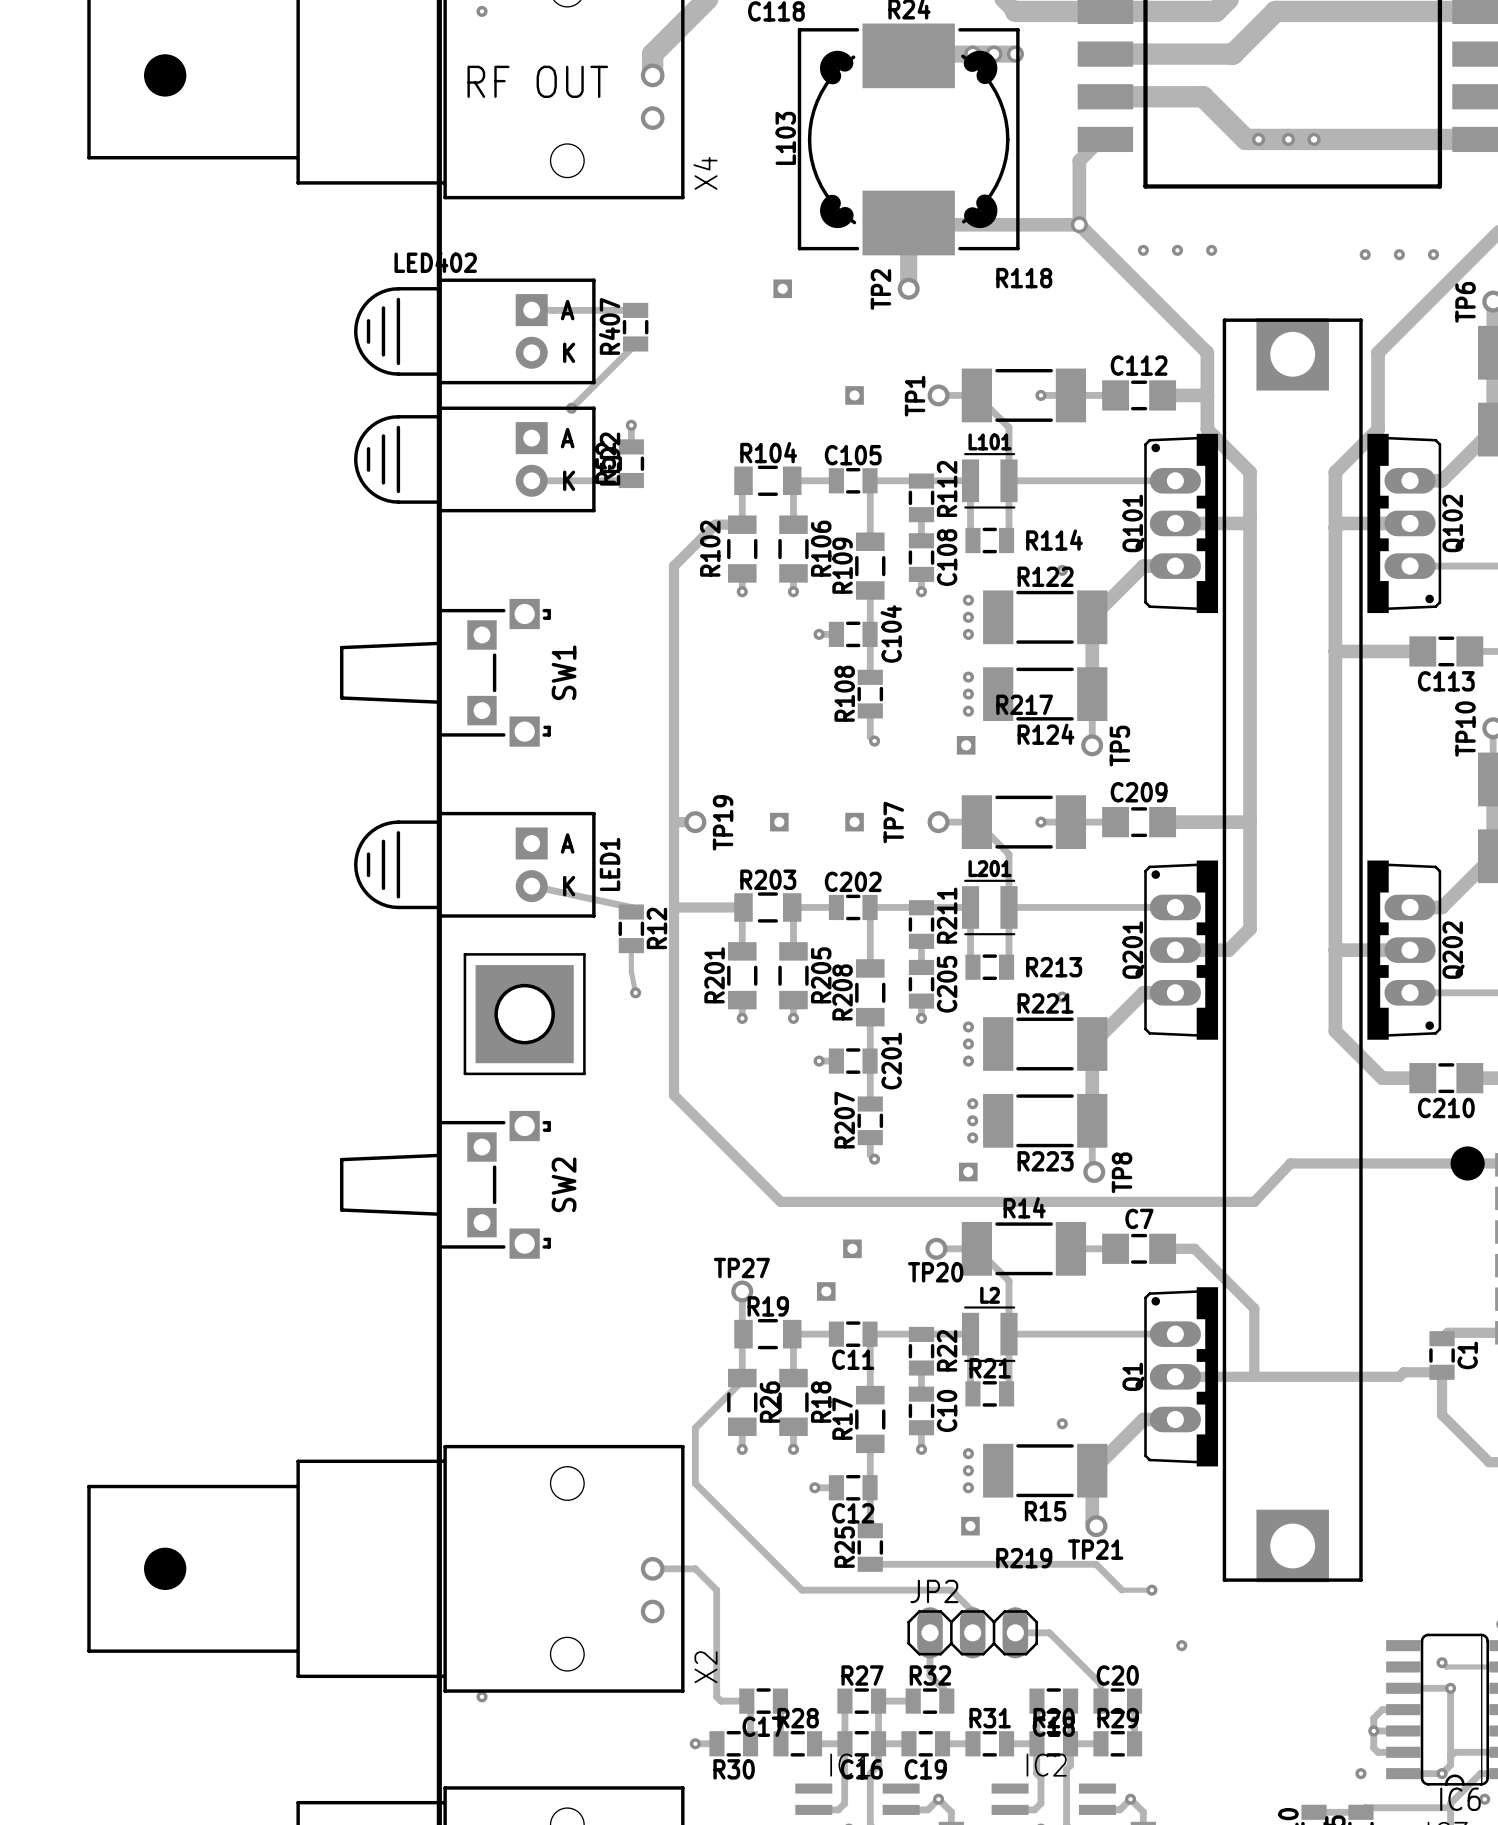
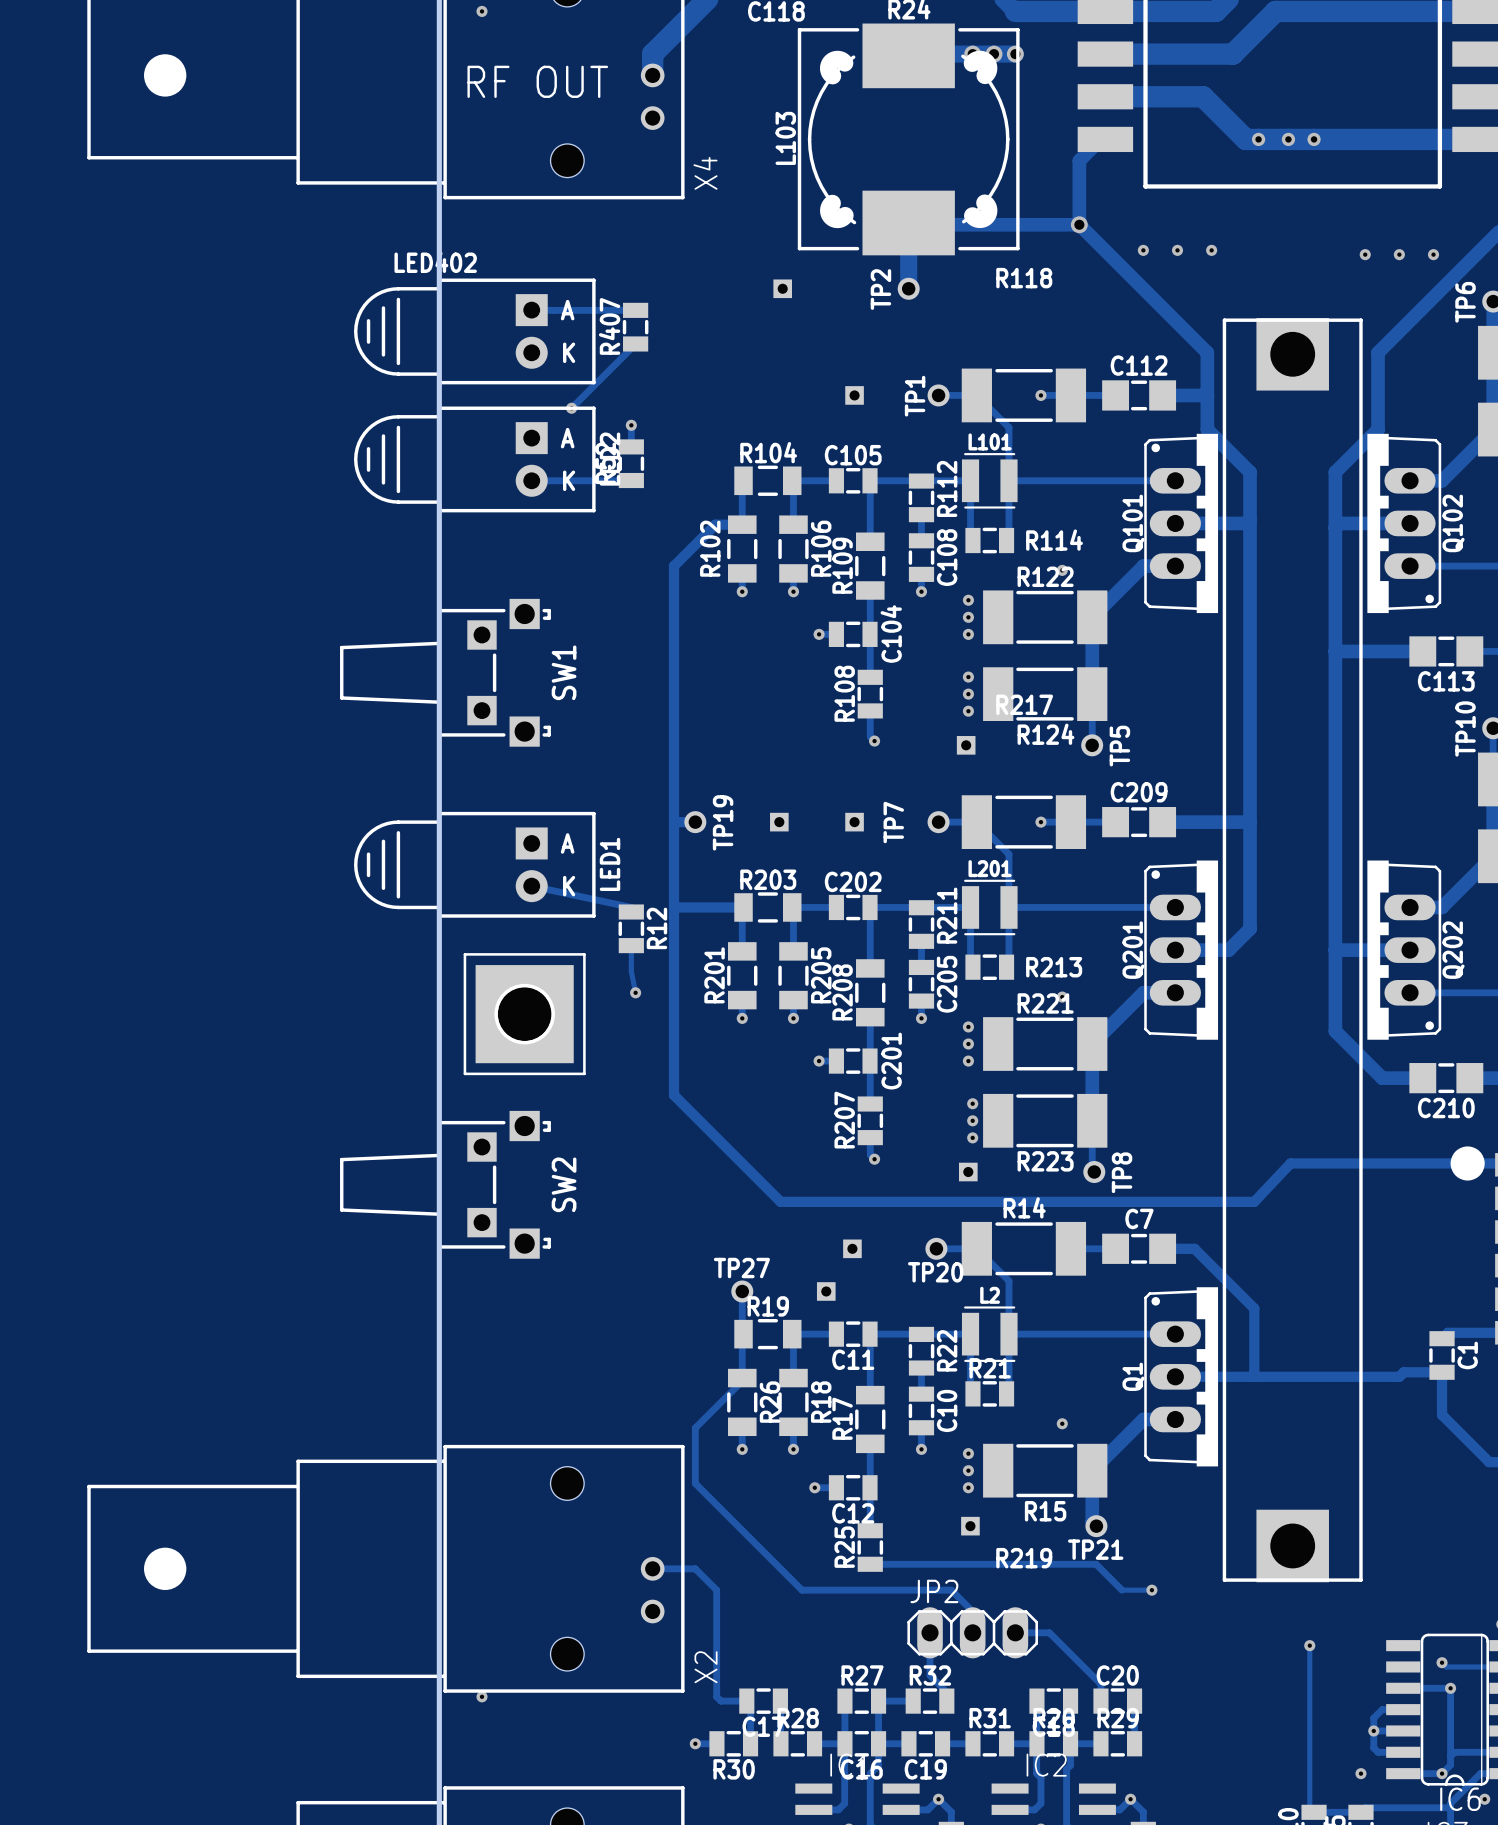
via: (1181, 1645) -> none
track: none -> (1309, 1645) (1309, 1808)
via: none -> (1309, 1645)

